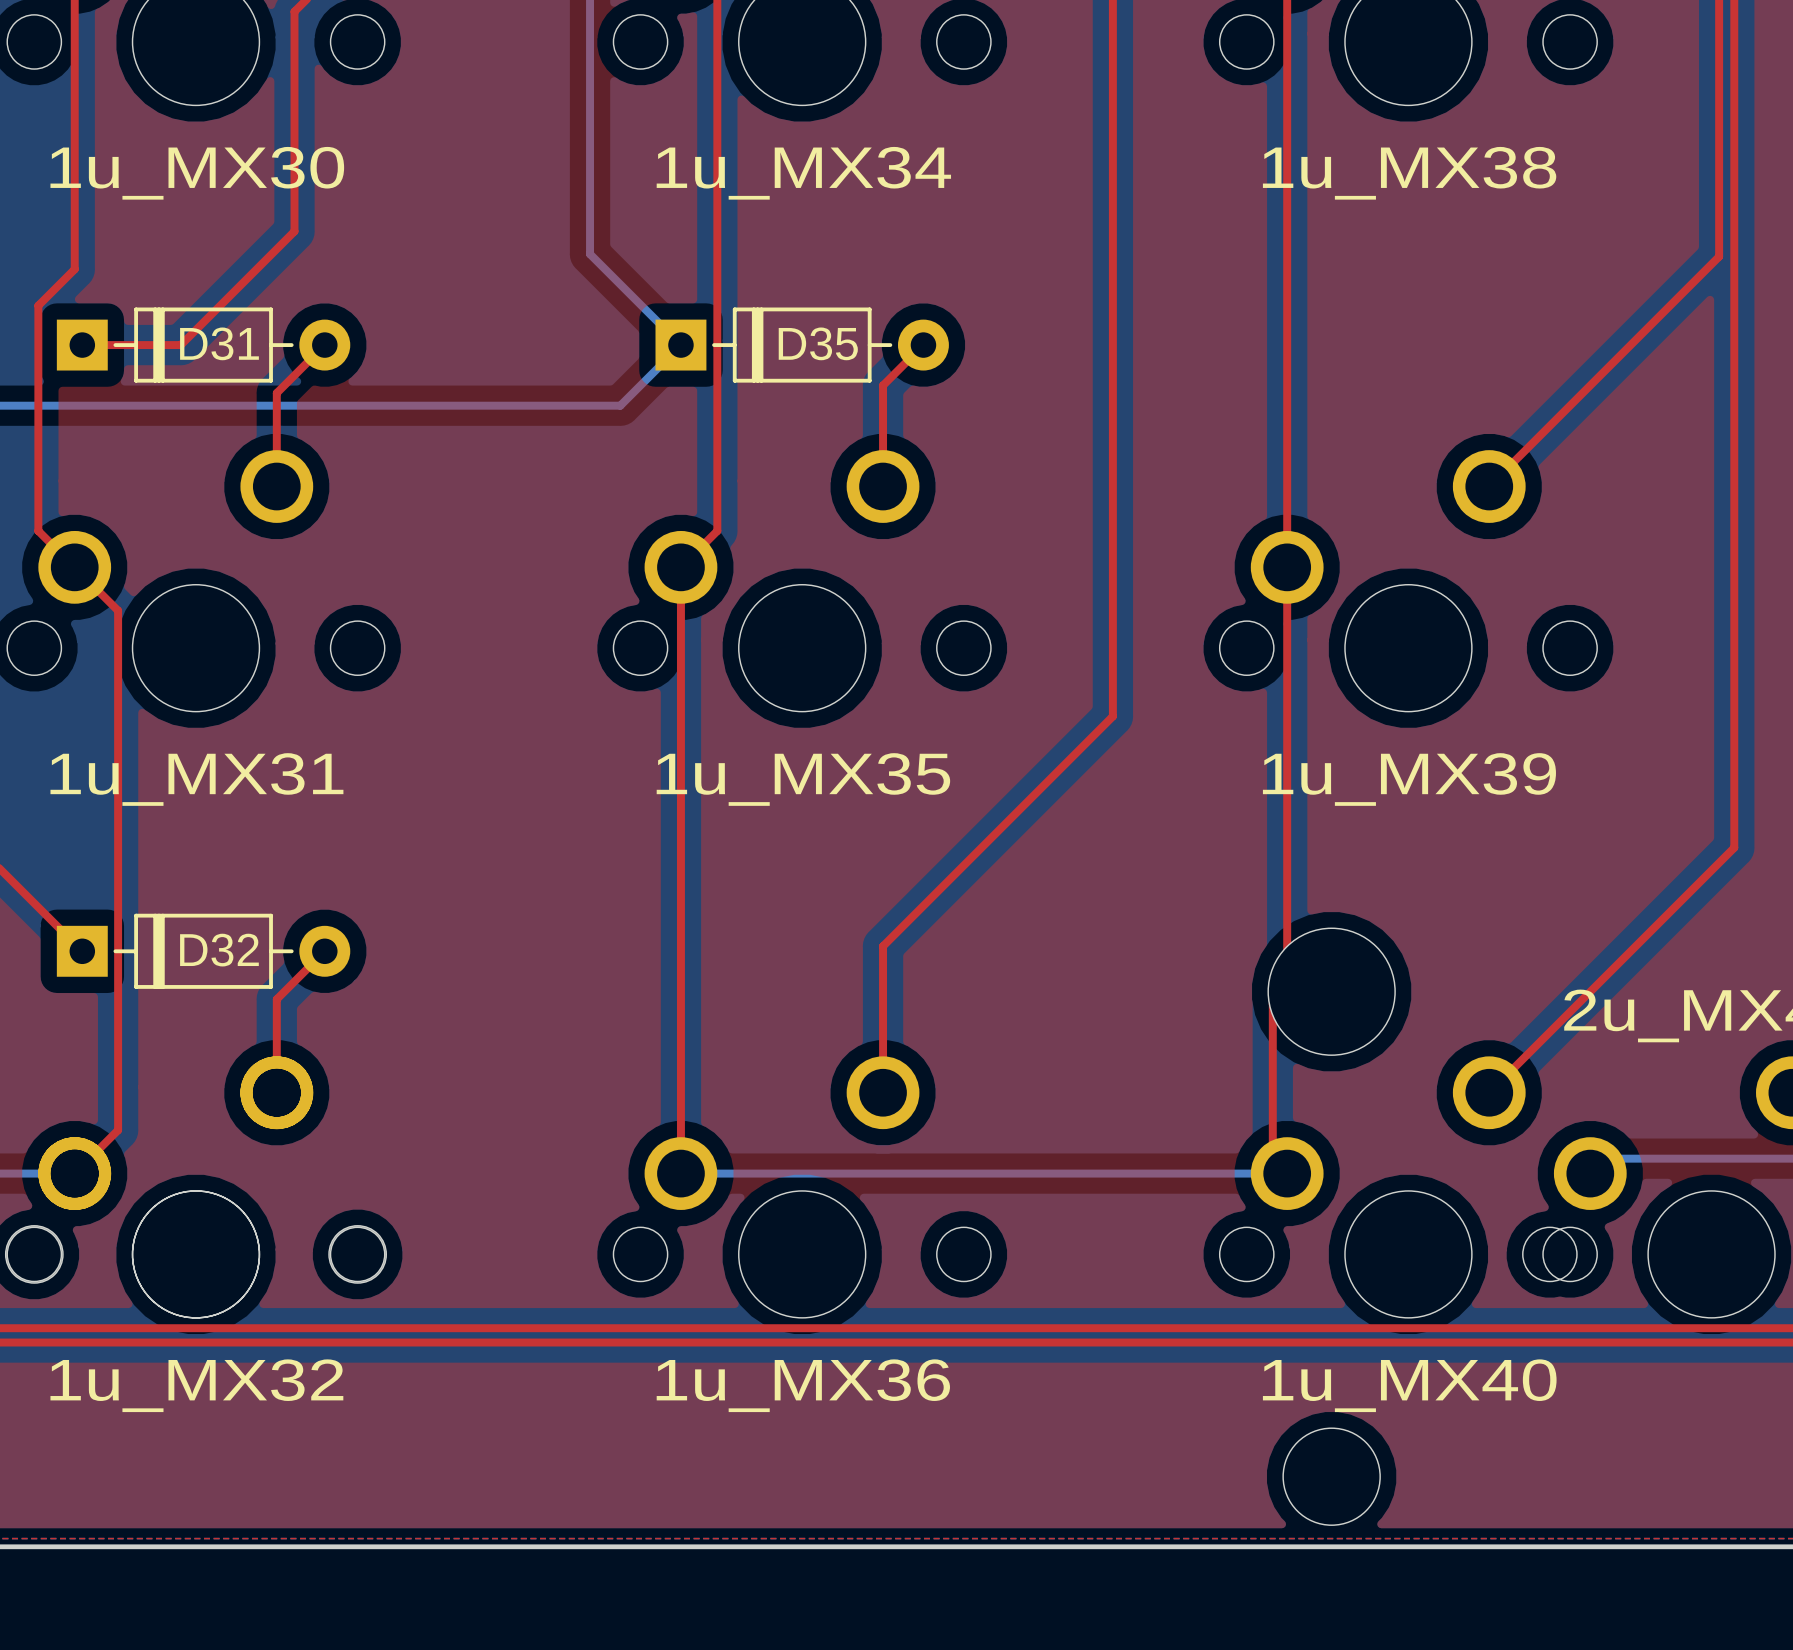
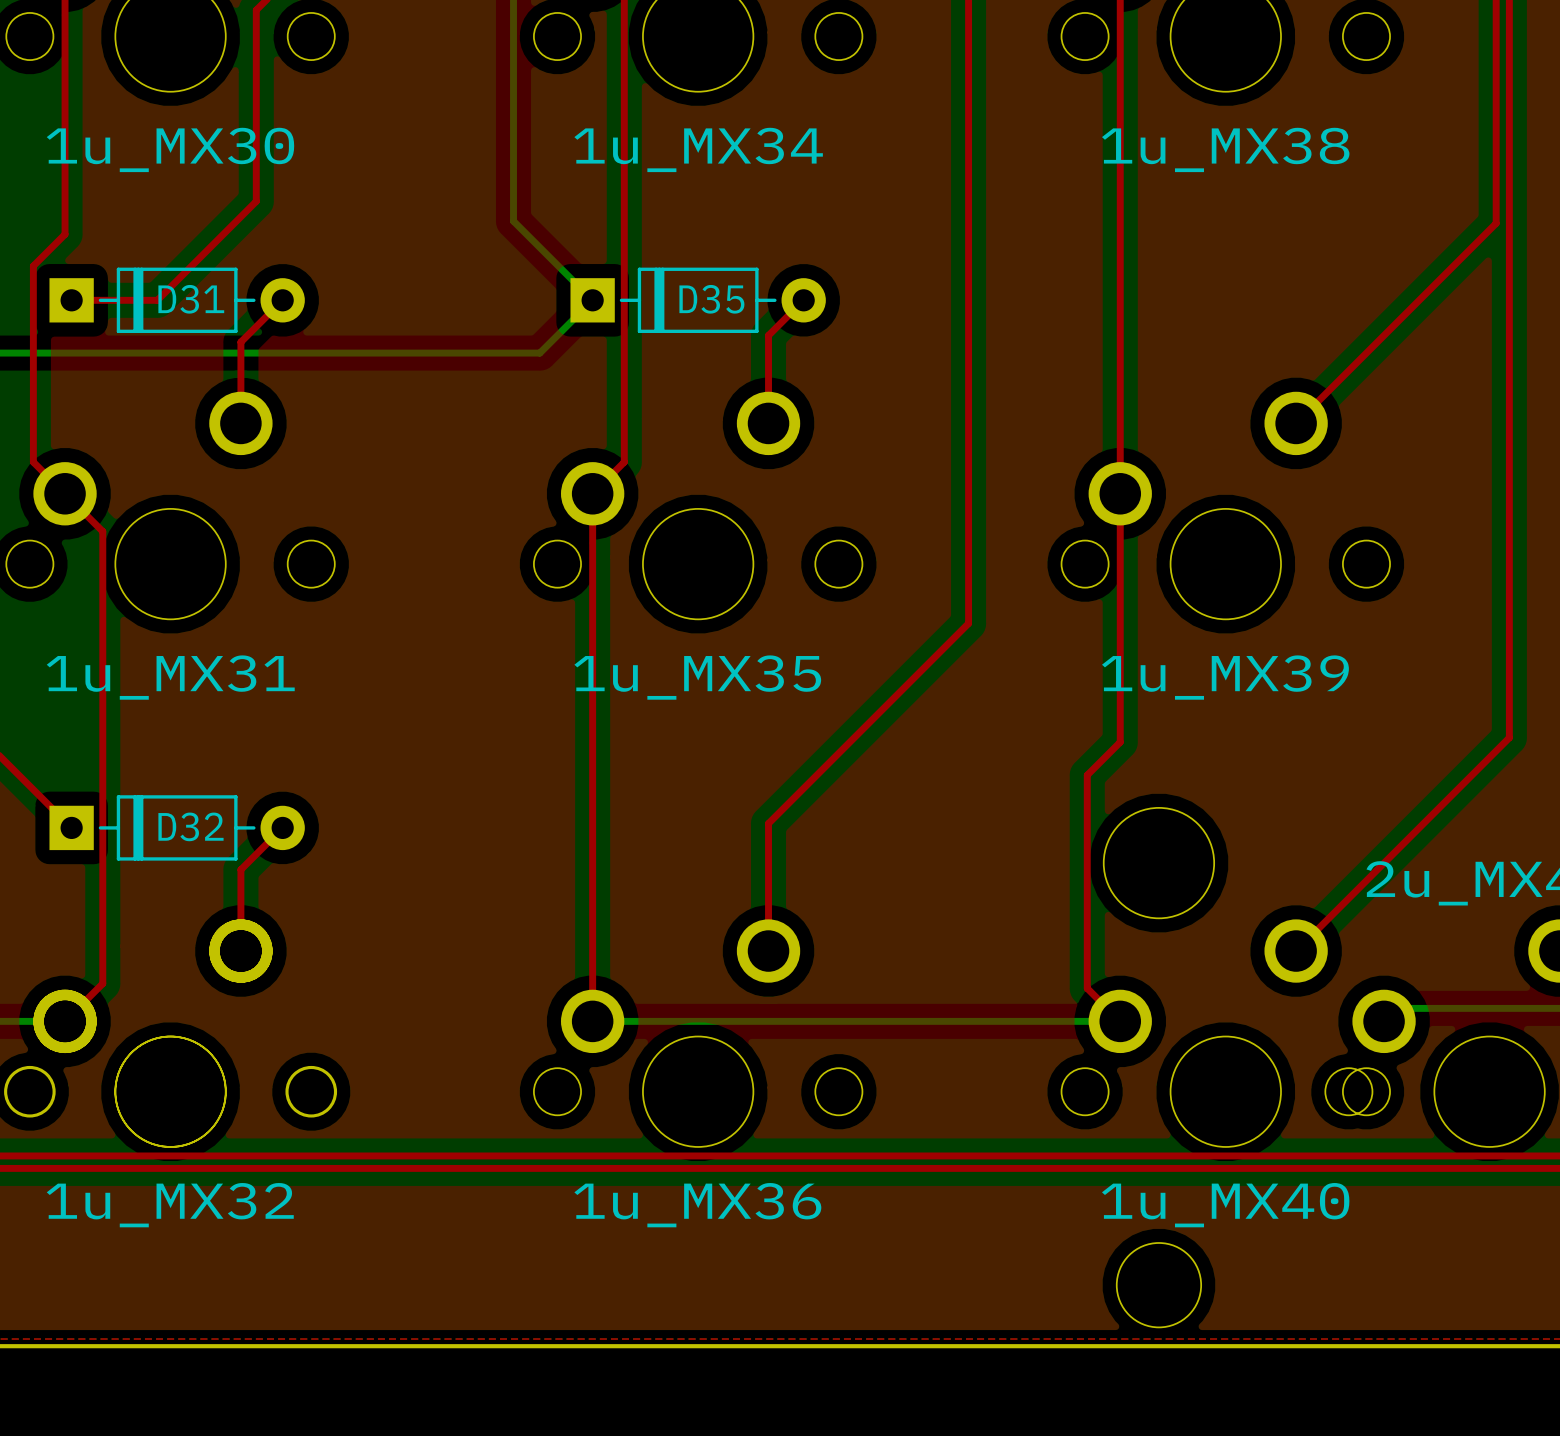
top track: (1287, 852) (1287, 989) (1272, 1003) (1272, 1159) -> (1120, 742) (1087, 775) (1087, 988) (1107, 1008)

